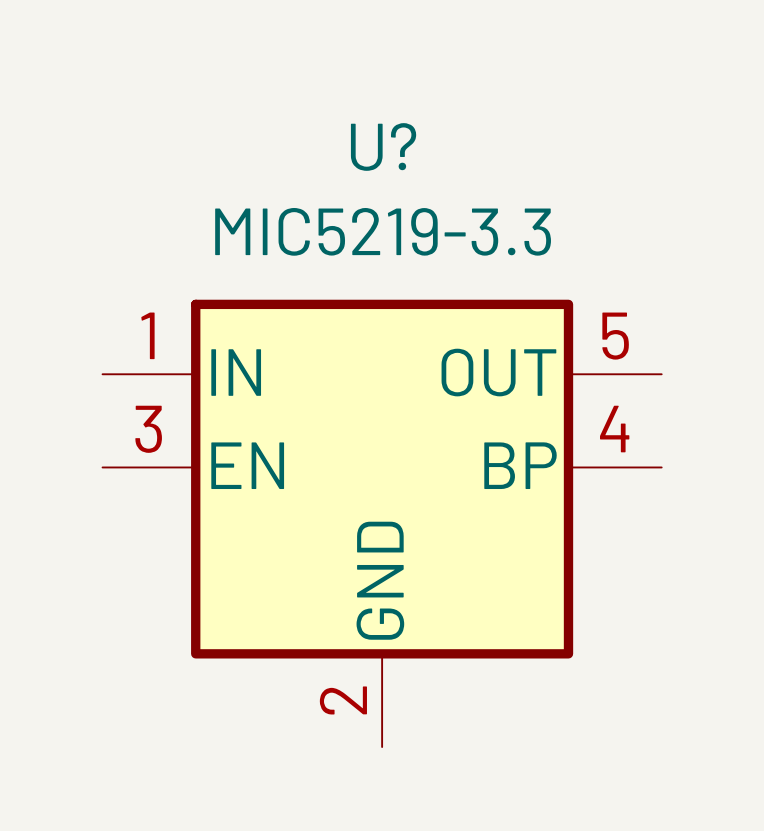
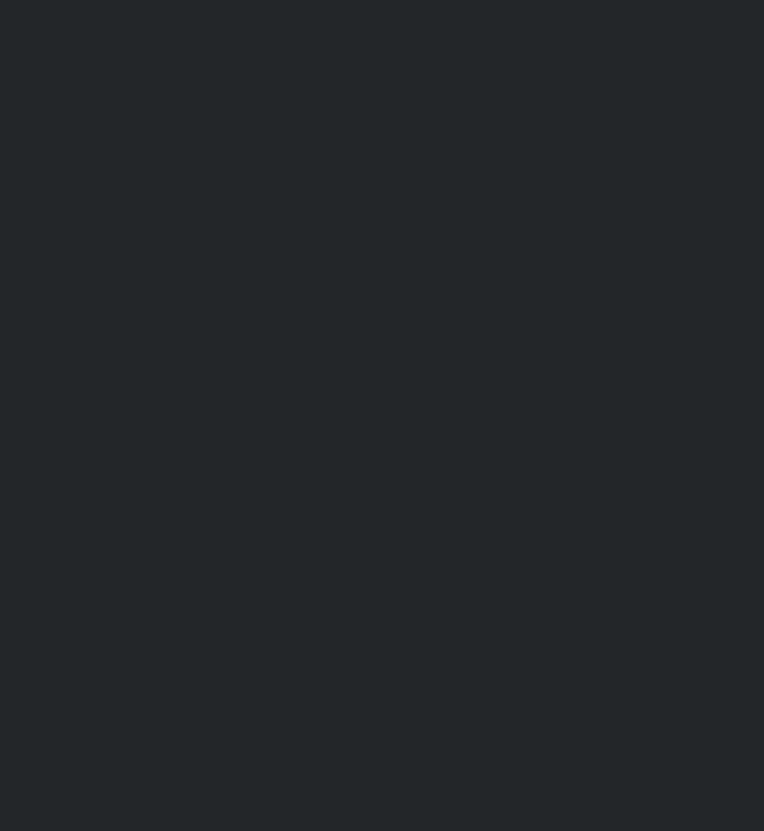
U?: MIC5219-3.3 (382, 523) -> none

